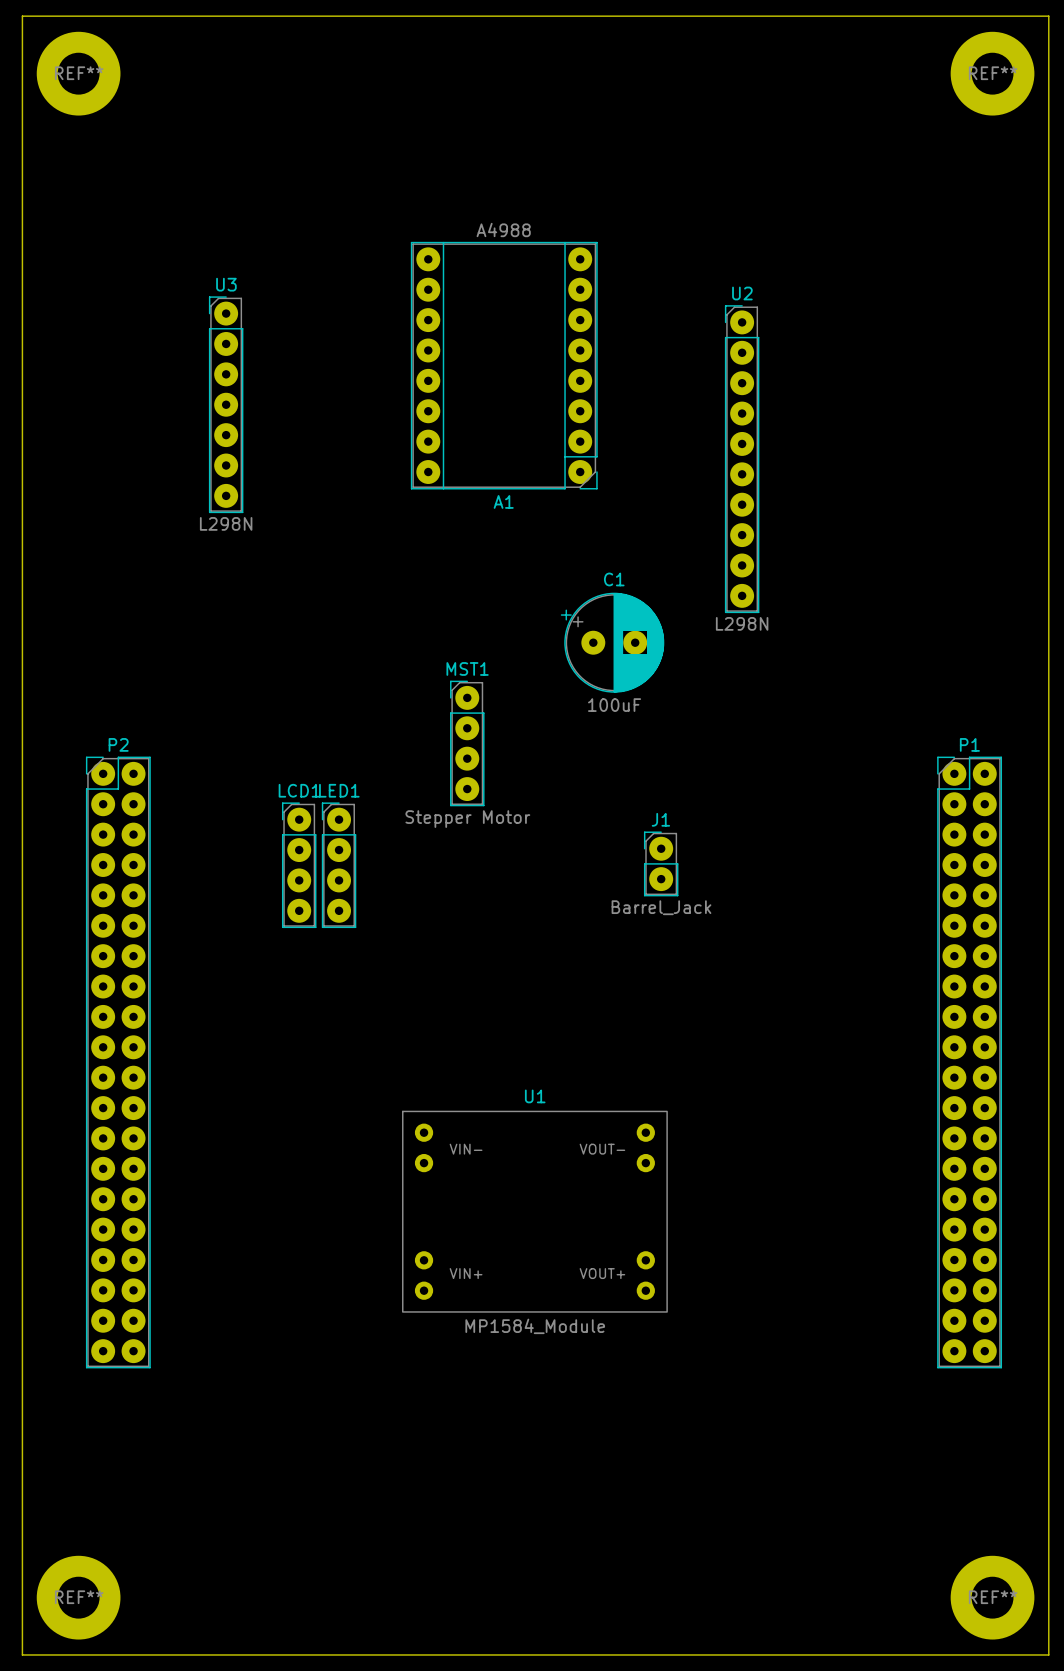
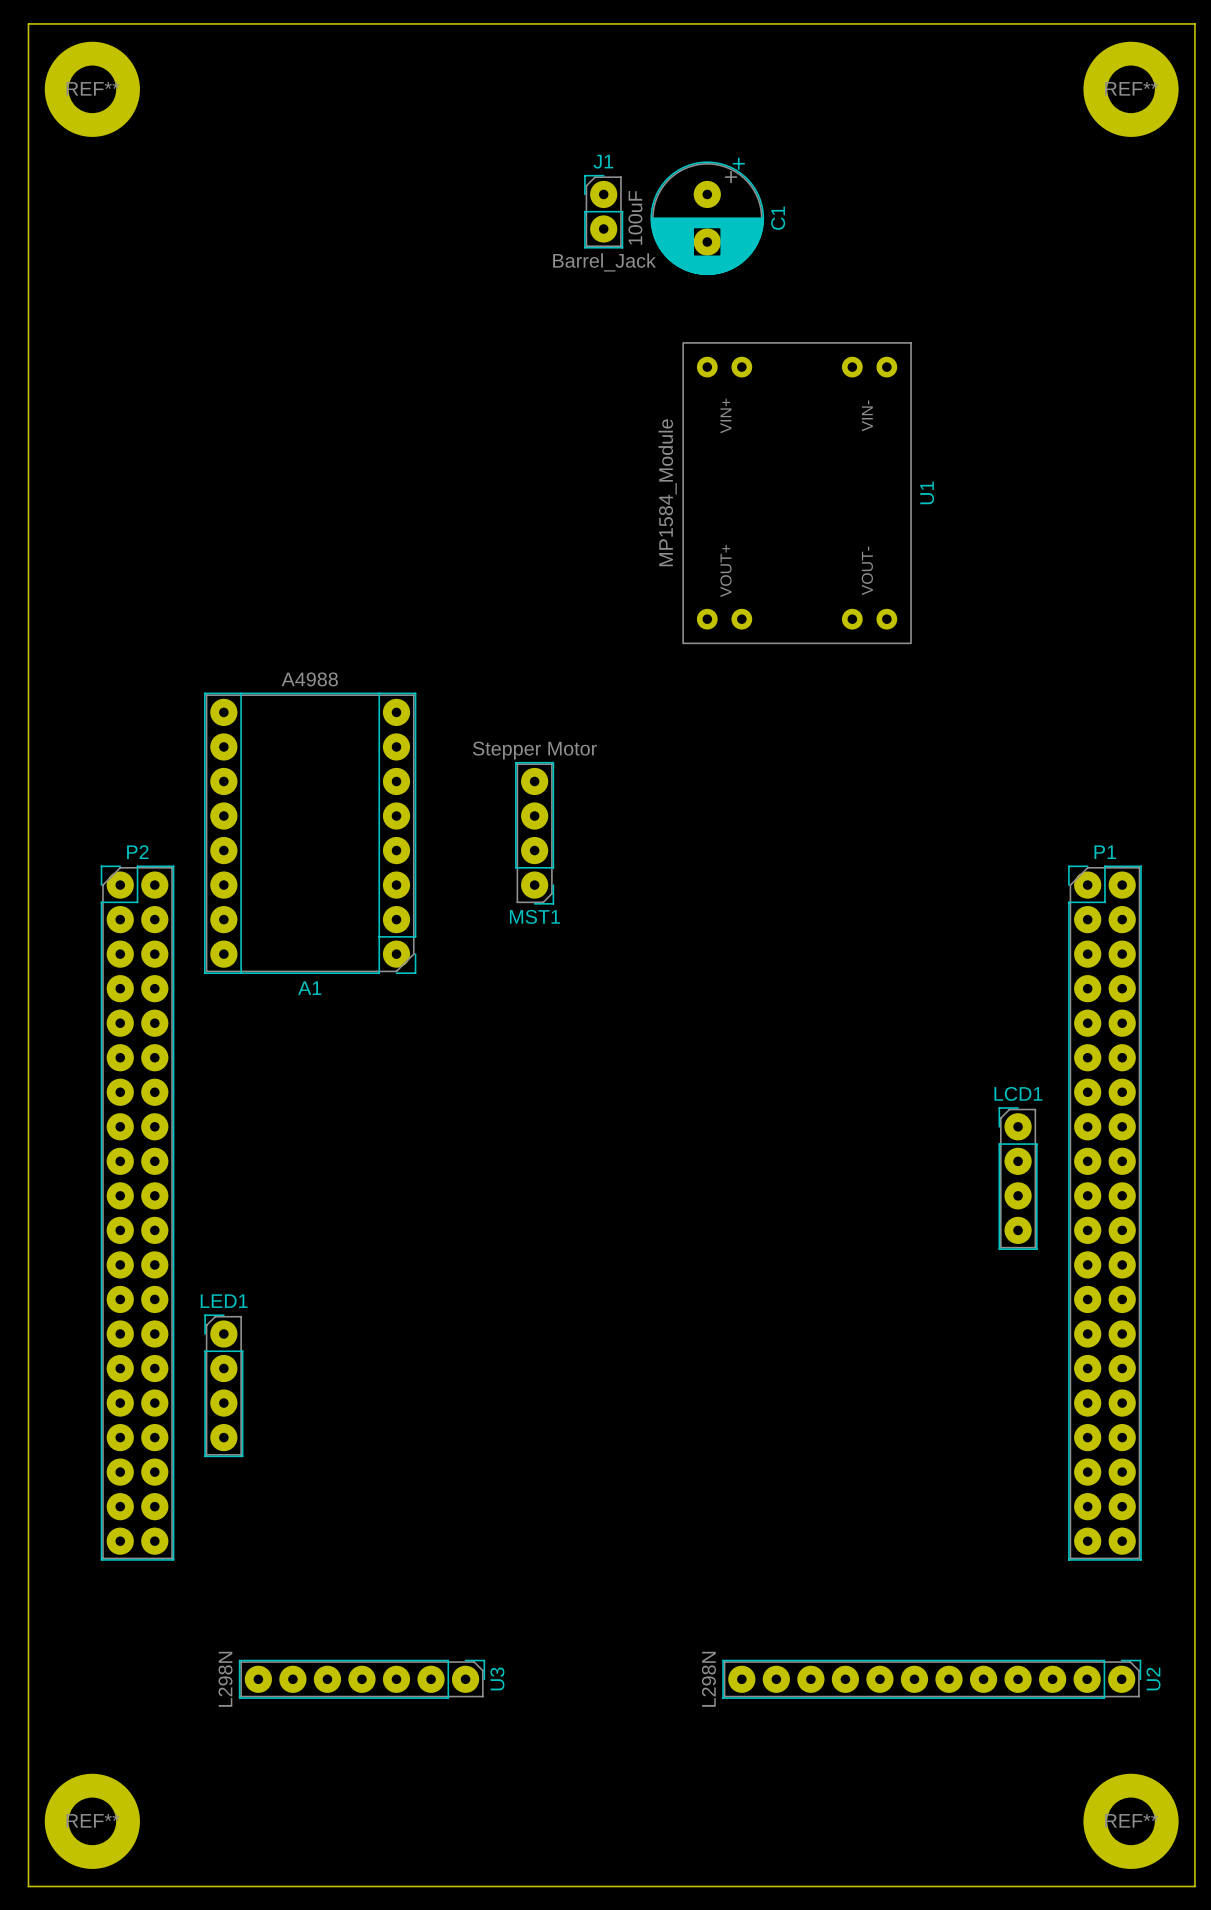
U2 name position: U2 (742, 293) -> U2 (1153, 1679)
U2 footprint: [724, 305, 760, 614] -> [722, 1659, 1142, 1699]
A1 position: (504, 365) -> (310, 833)
U3 rotation: 0° (226, 404) -> 90° clockwise (361, 1679)
U3 position: (226, 404) -> (361, 1679)
U2 value position: L298N (742, 623) -> L298N (708, 1679)
C1 rotation: 0° (612, 642) -> 90° clockwise (707, 216)
C1 position: (612, 642) -> (707, 216)
MST1 rotation: 0° (467, 743) -> 180° (534, 833)
J1 position: (661, 863) -> (603, 211)
LCD1 position: (299, 865) -> (1018, 1178)
LED1 position: (339, 865) -> (223, 1385)
U1 rotation: 0° (534, 1211) -> 90° clockwise (797, 493)
U1 position: (534, 1211) -> (797, 493)

